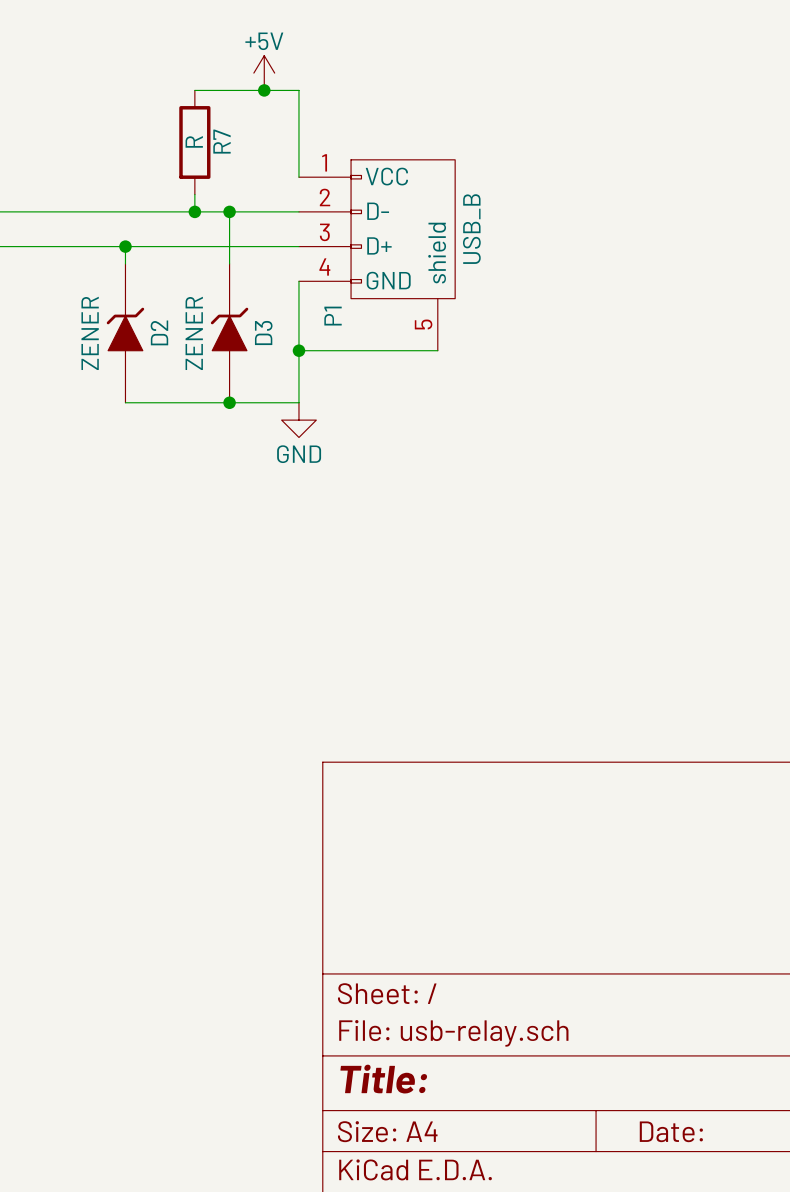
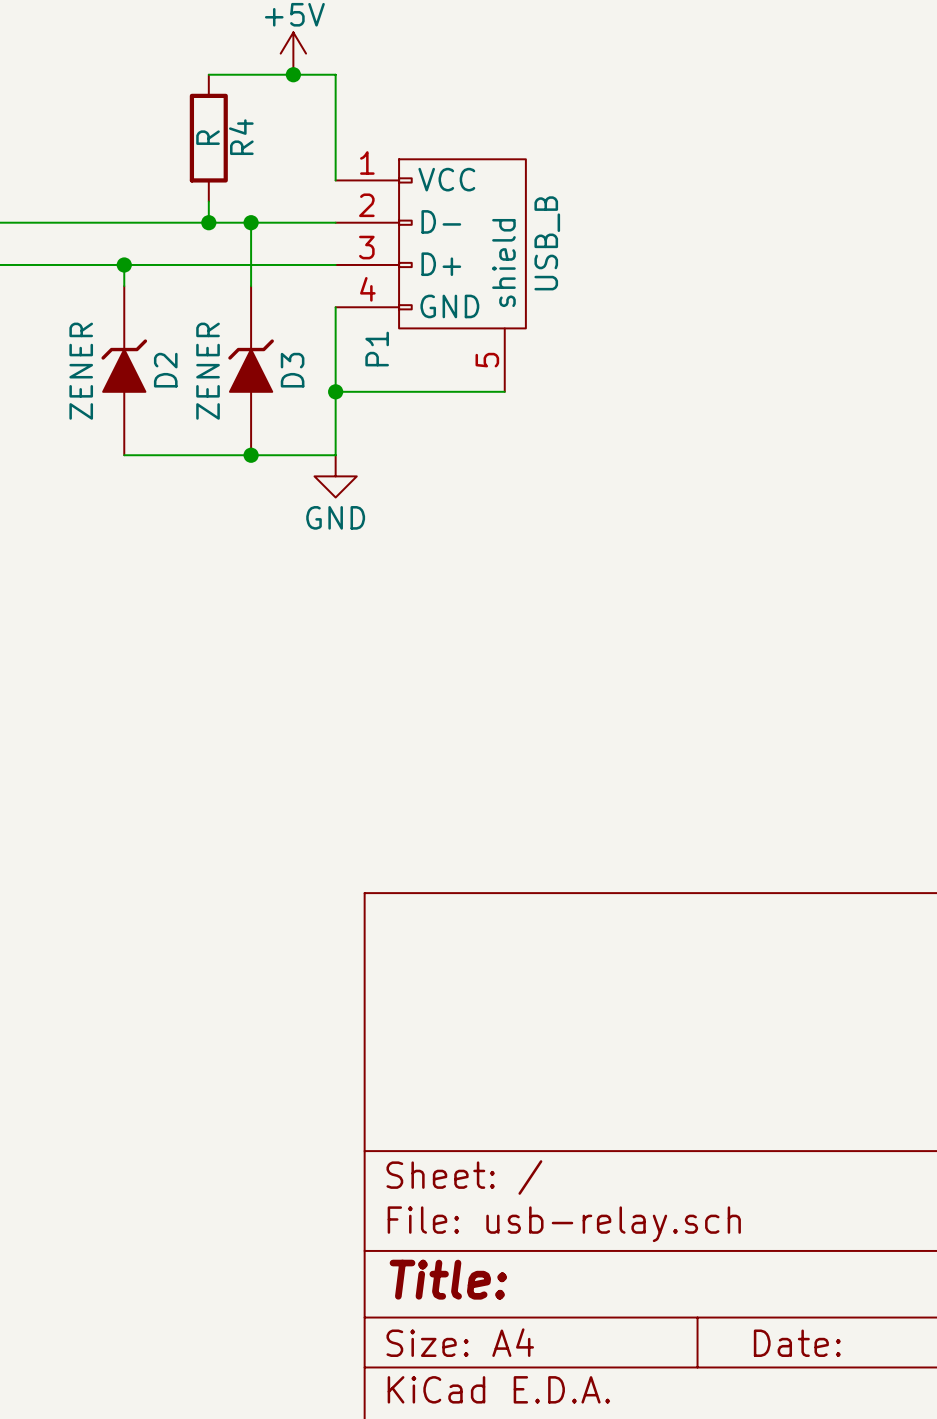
R7 name: R7 (221, 141) -> R4 (241, 137)

